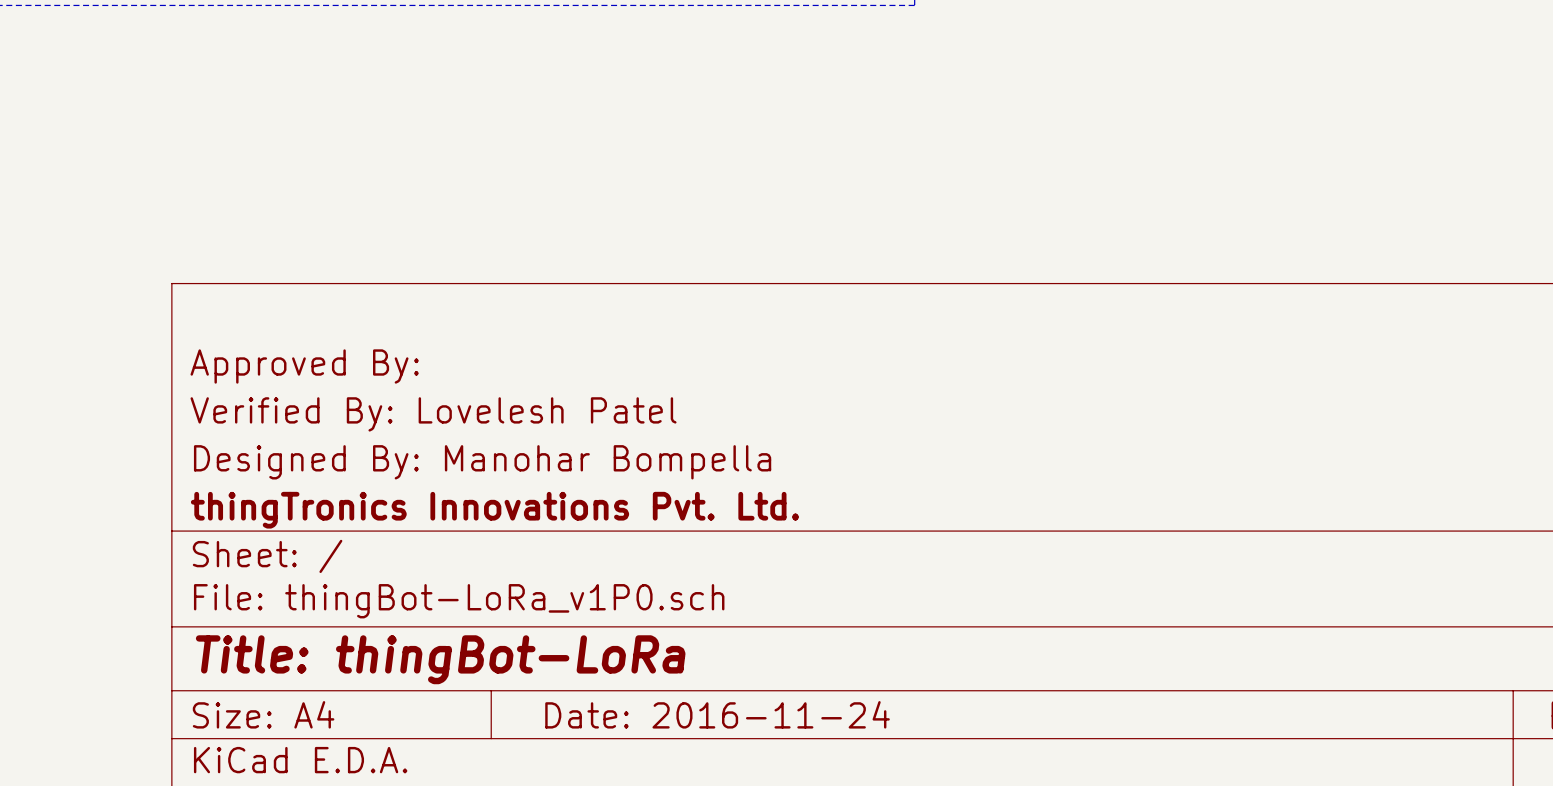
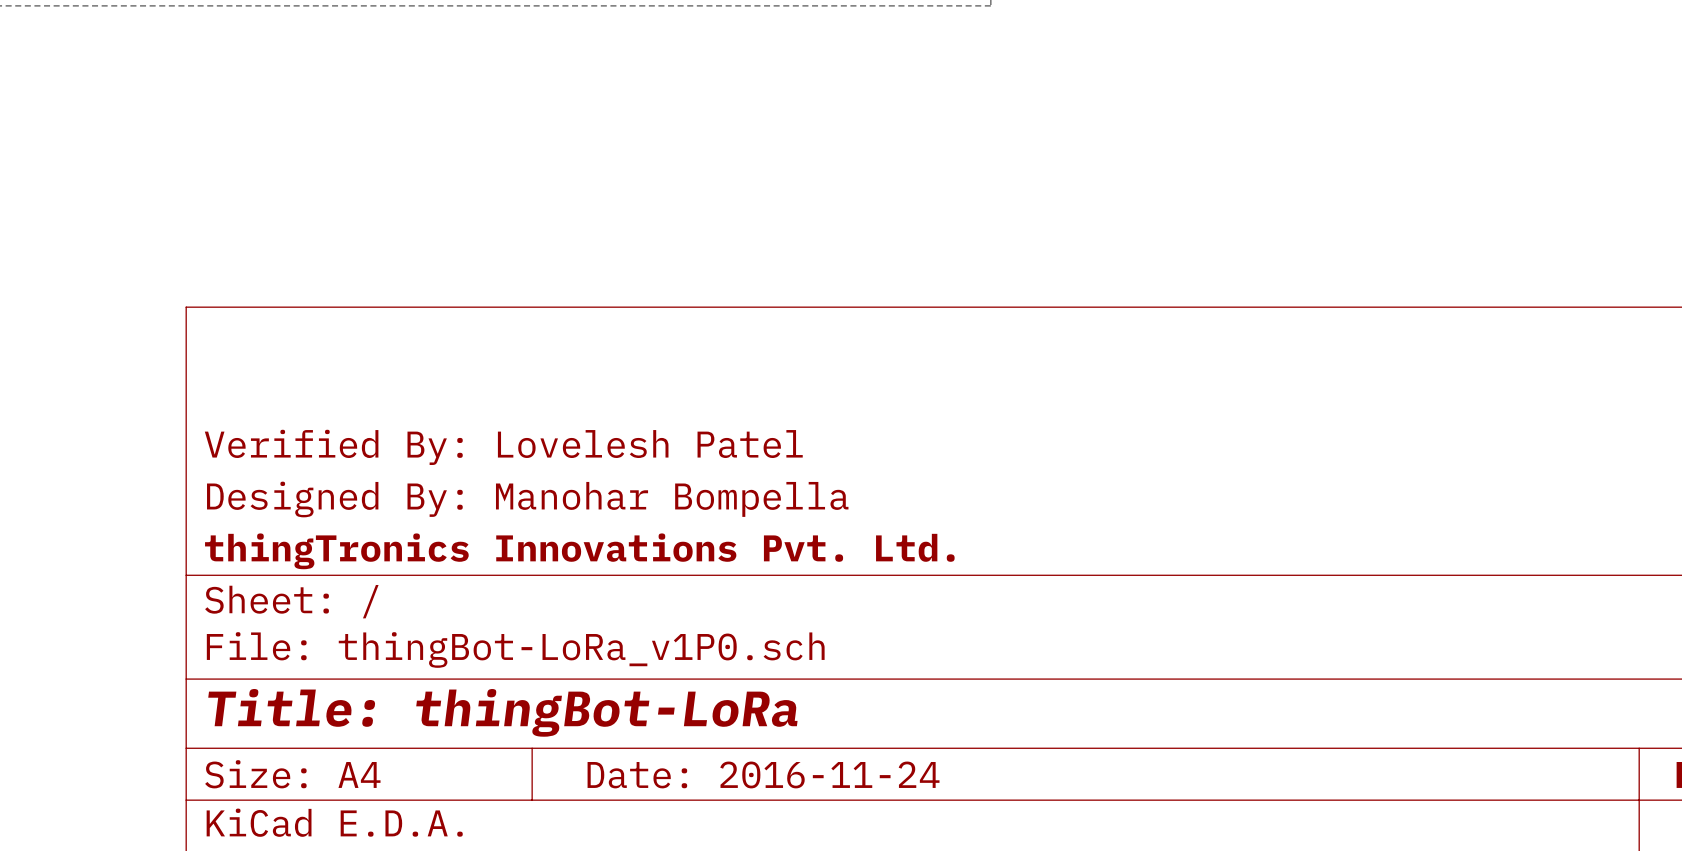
title block: Approved By: (304, 366) -> none

